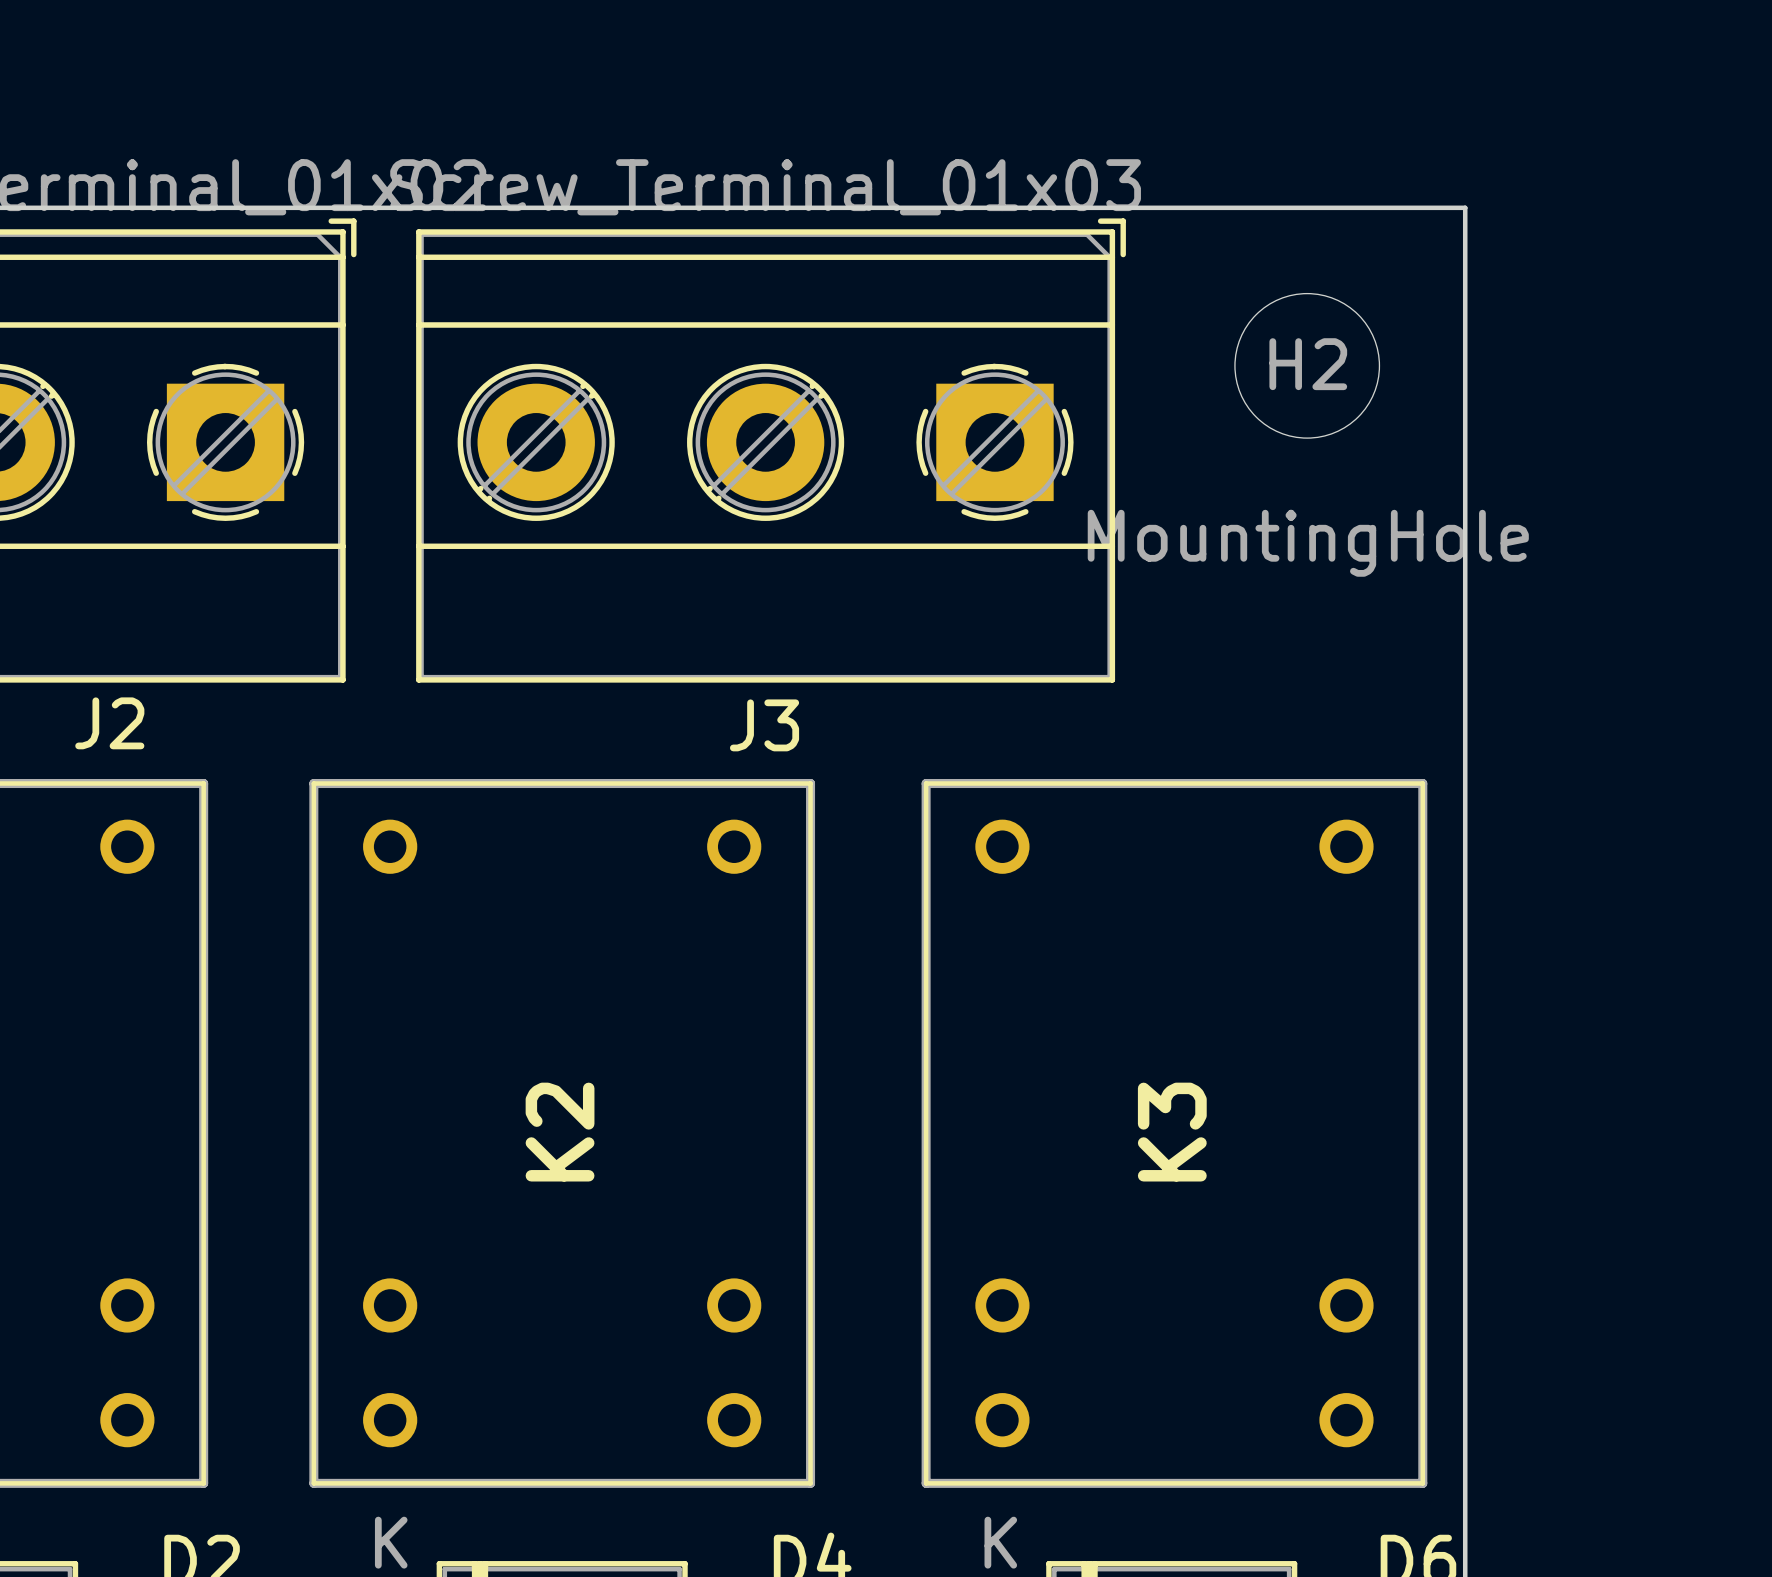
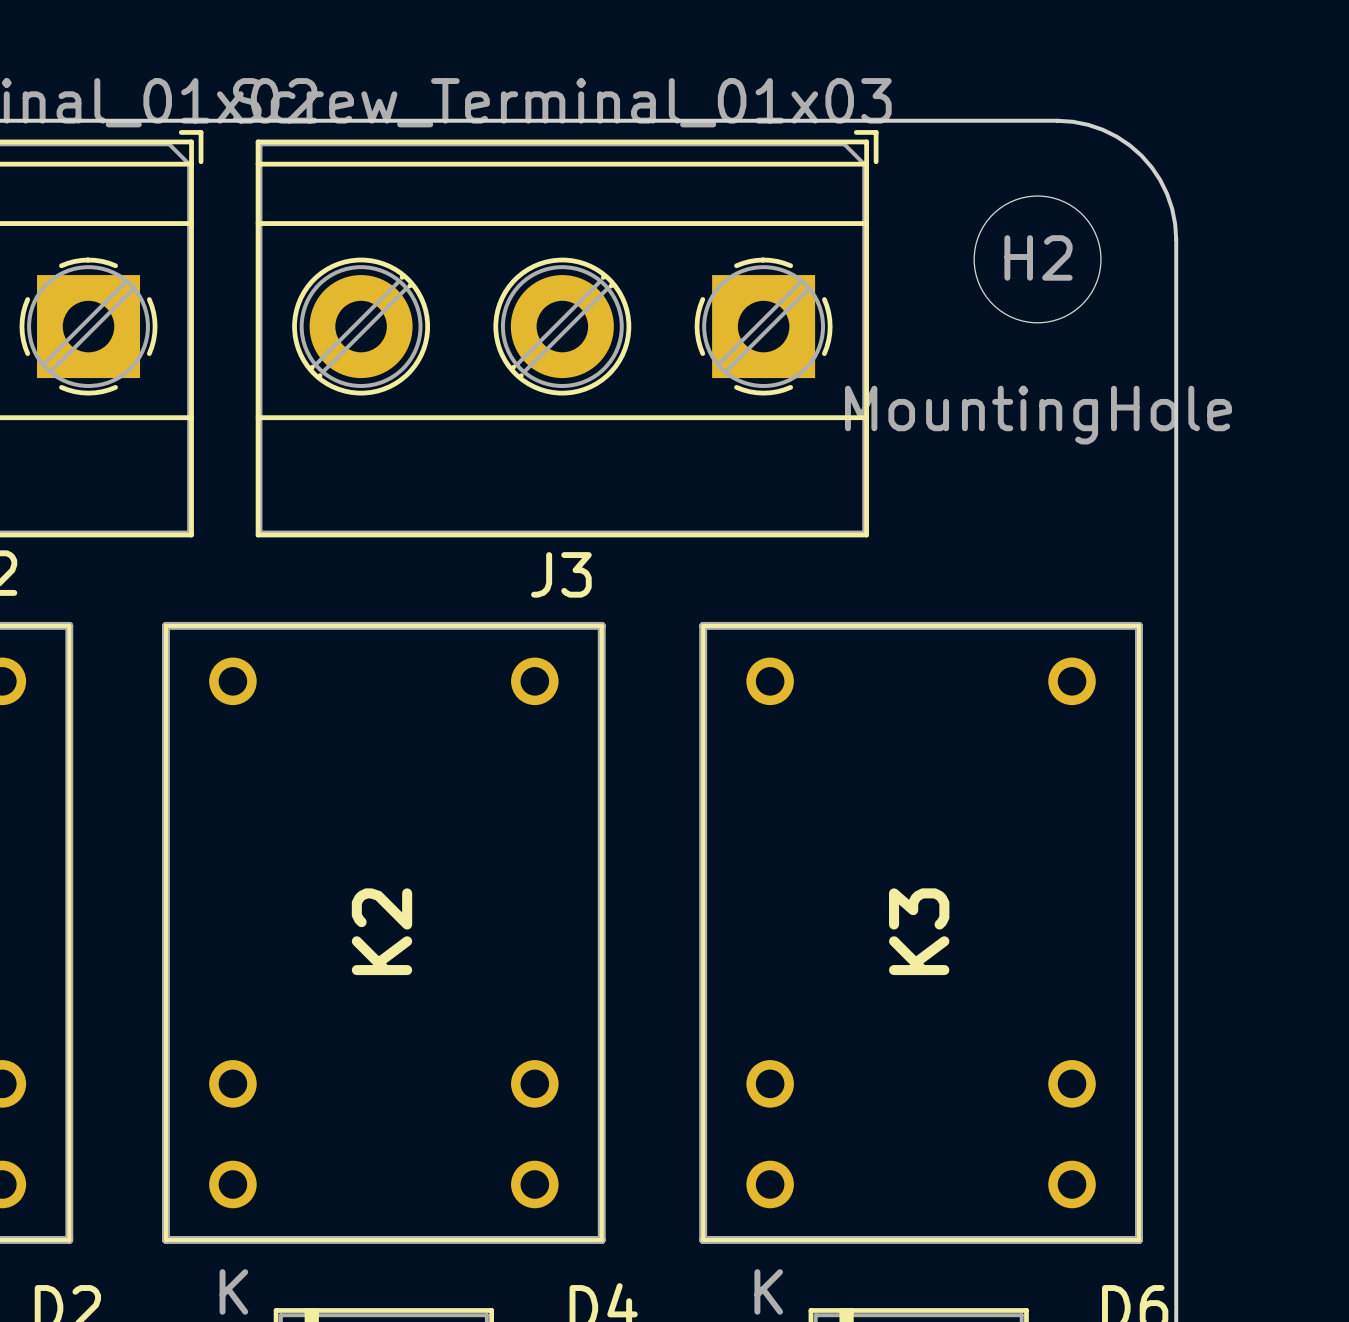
board edge: (1329, 207) (1465, 207) (1465, 343) -> (1057, 120) (1072, 121) (1102, 129) (1116, 136) (1141, 155) (1151, 167) (1167, 194) (1172, 208) (1176, 239)

